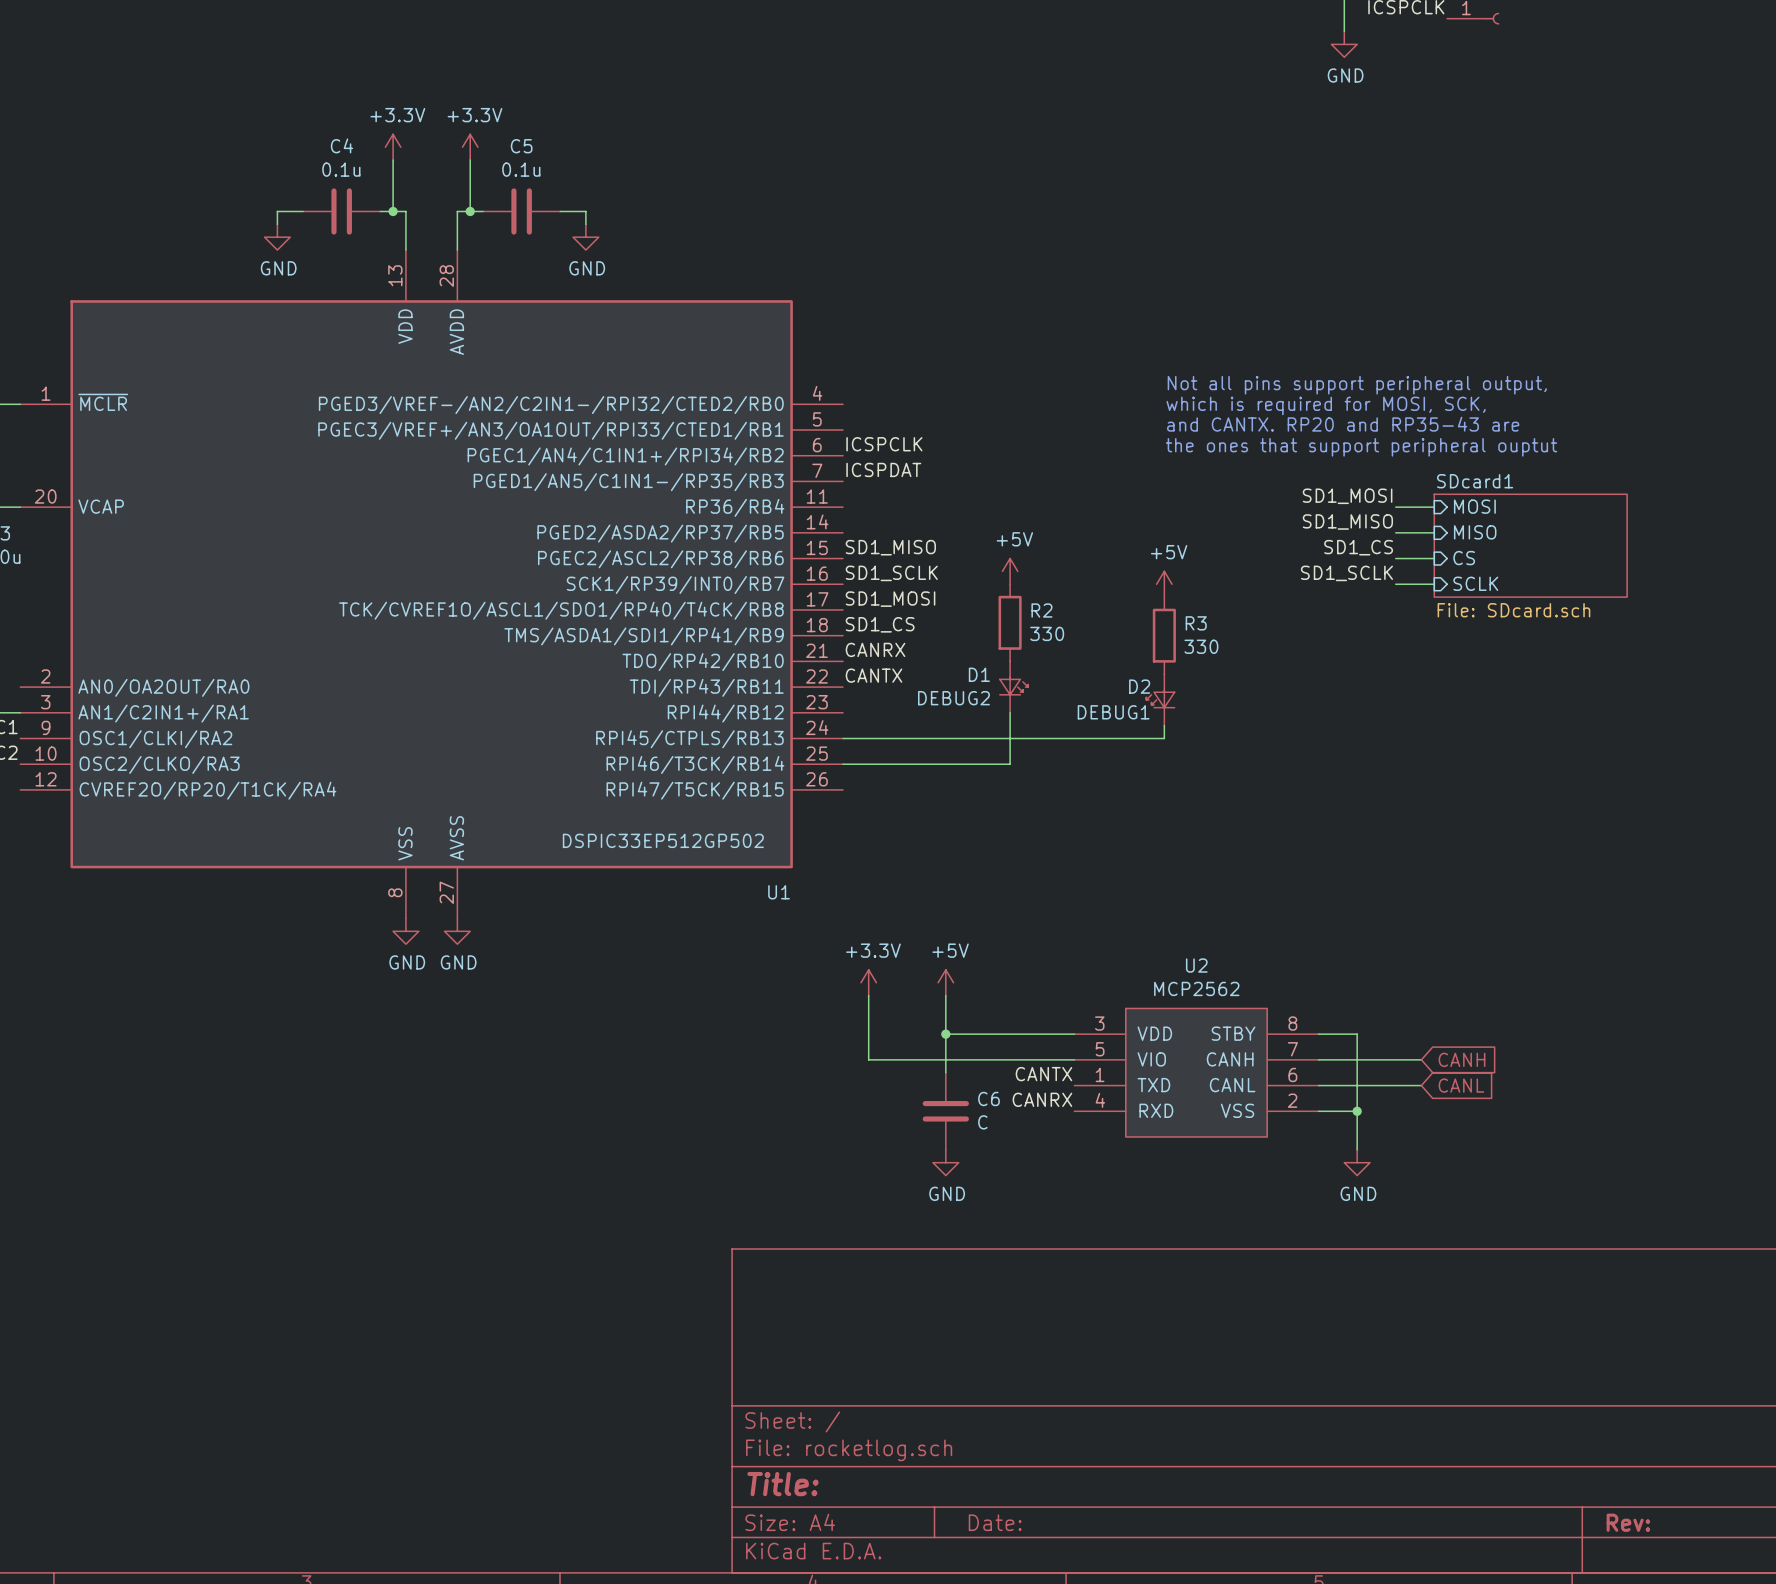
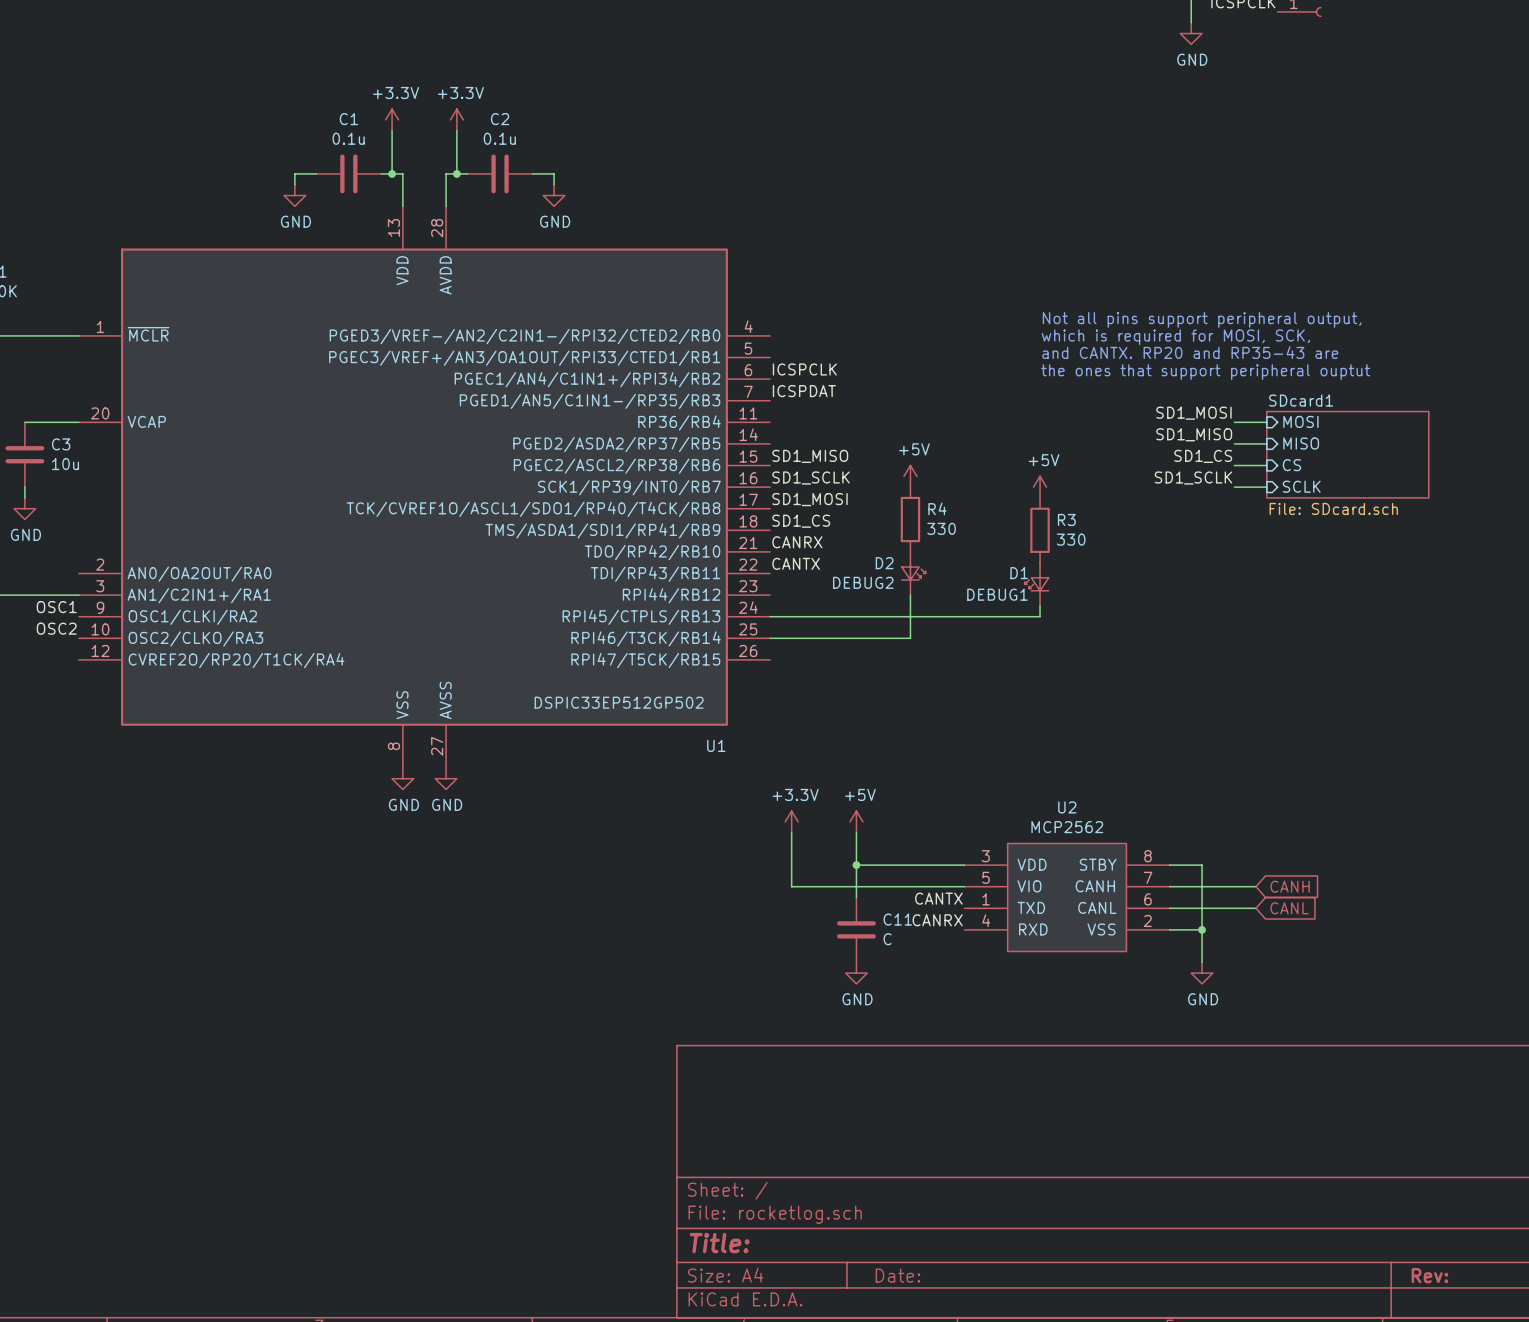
C4 name: C4 (341, 145) -> C1 (348, 119)
C5 name: C5 (521, 146) -> C2 (500, 119)
R2 name: R2 (1041, 610) -> R4 (937, 508)
D1 name: D1 (979, 674) -> D2 (884, 563)
D2 name: D2 (1139, 686) -> D1 (1019, 573)
C6 name: C6 (988, 1098) -> C11 (897, 919)

